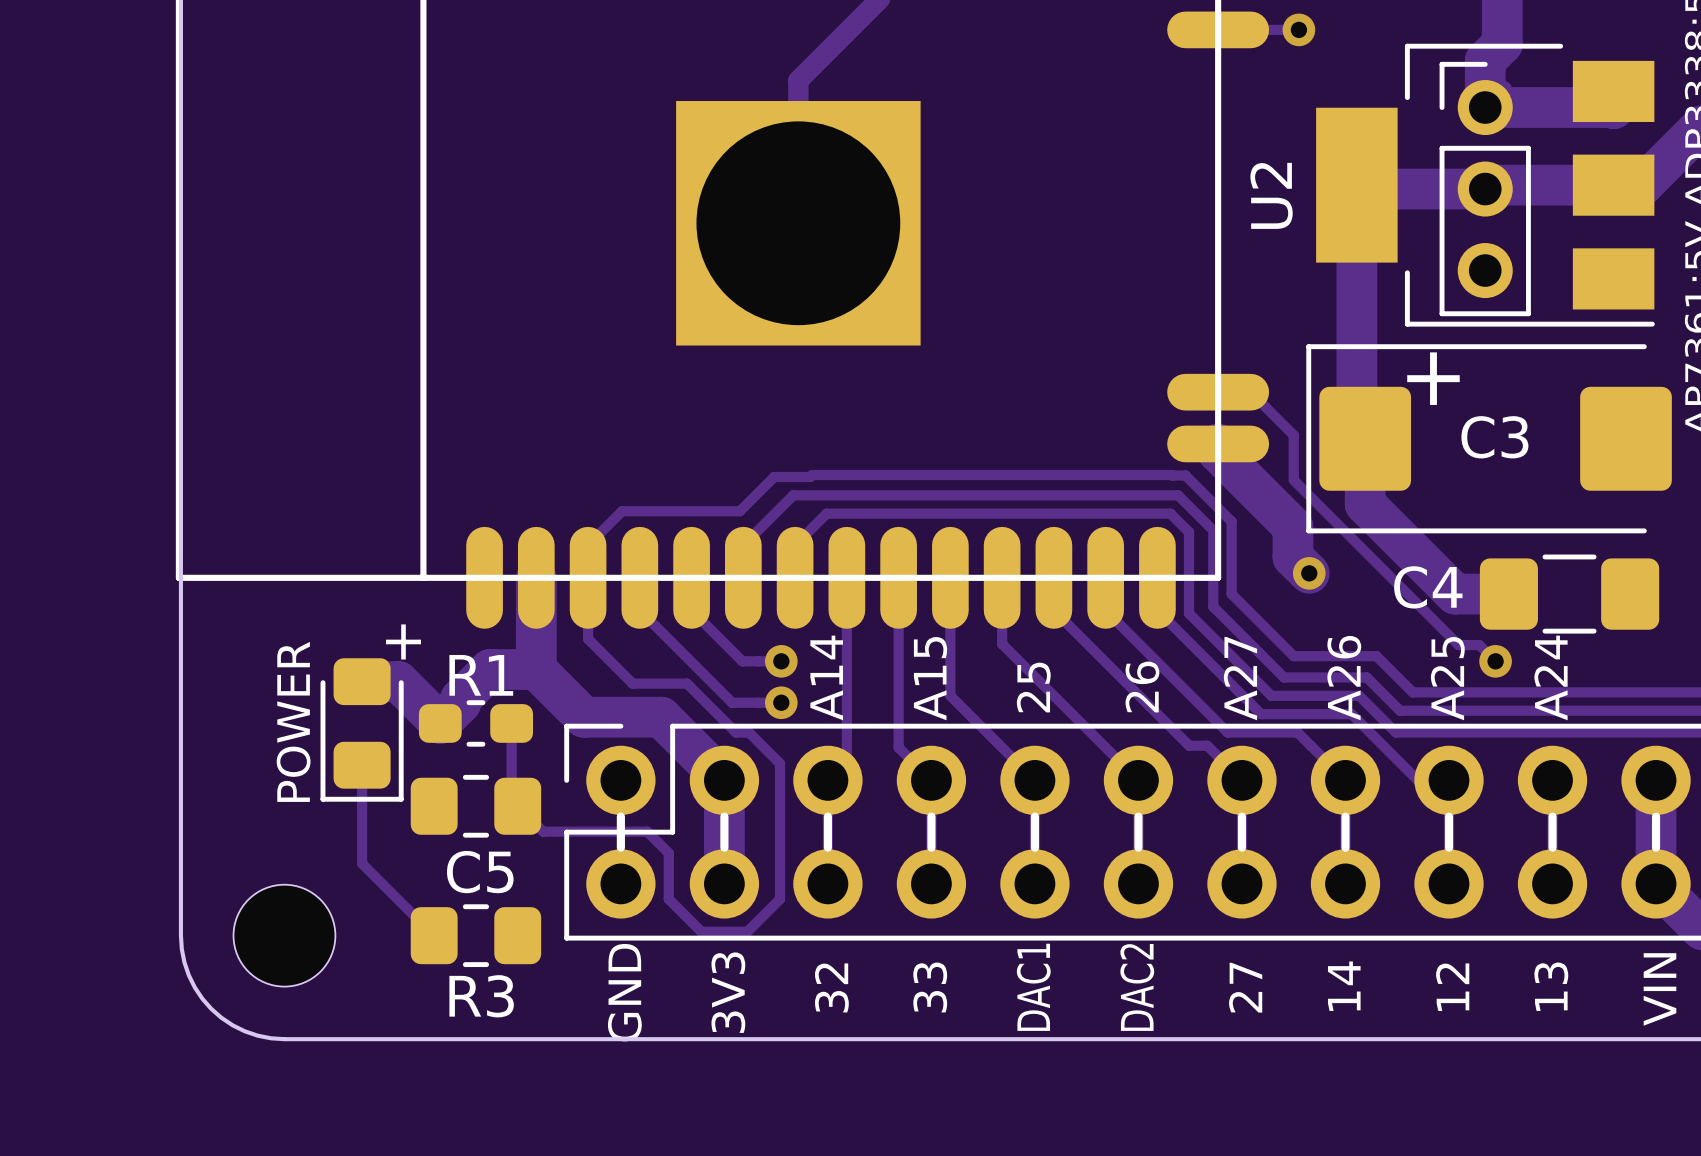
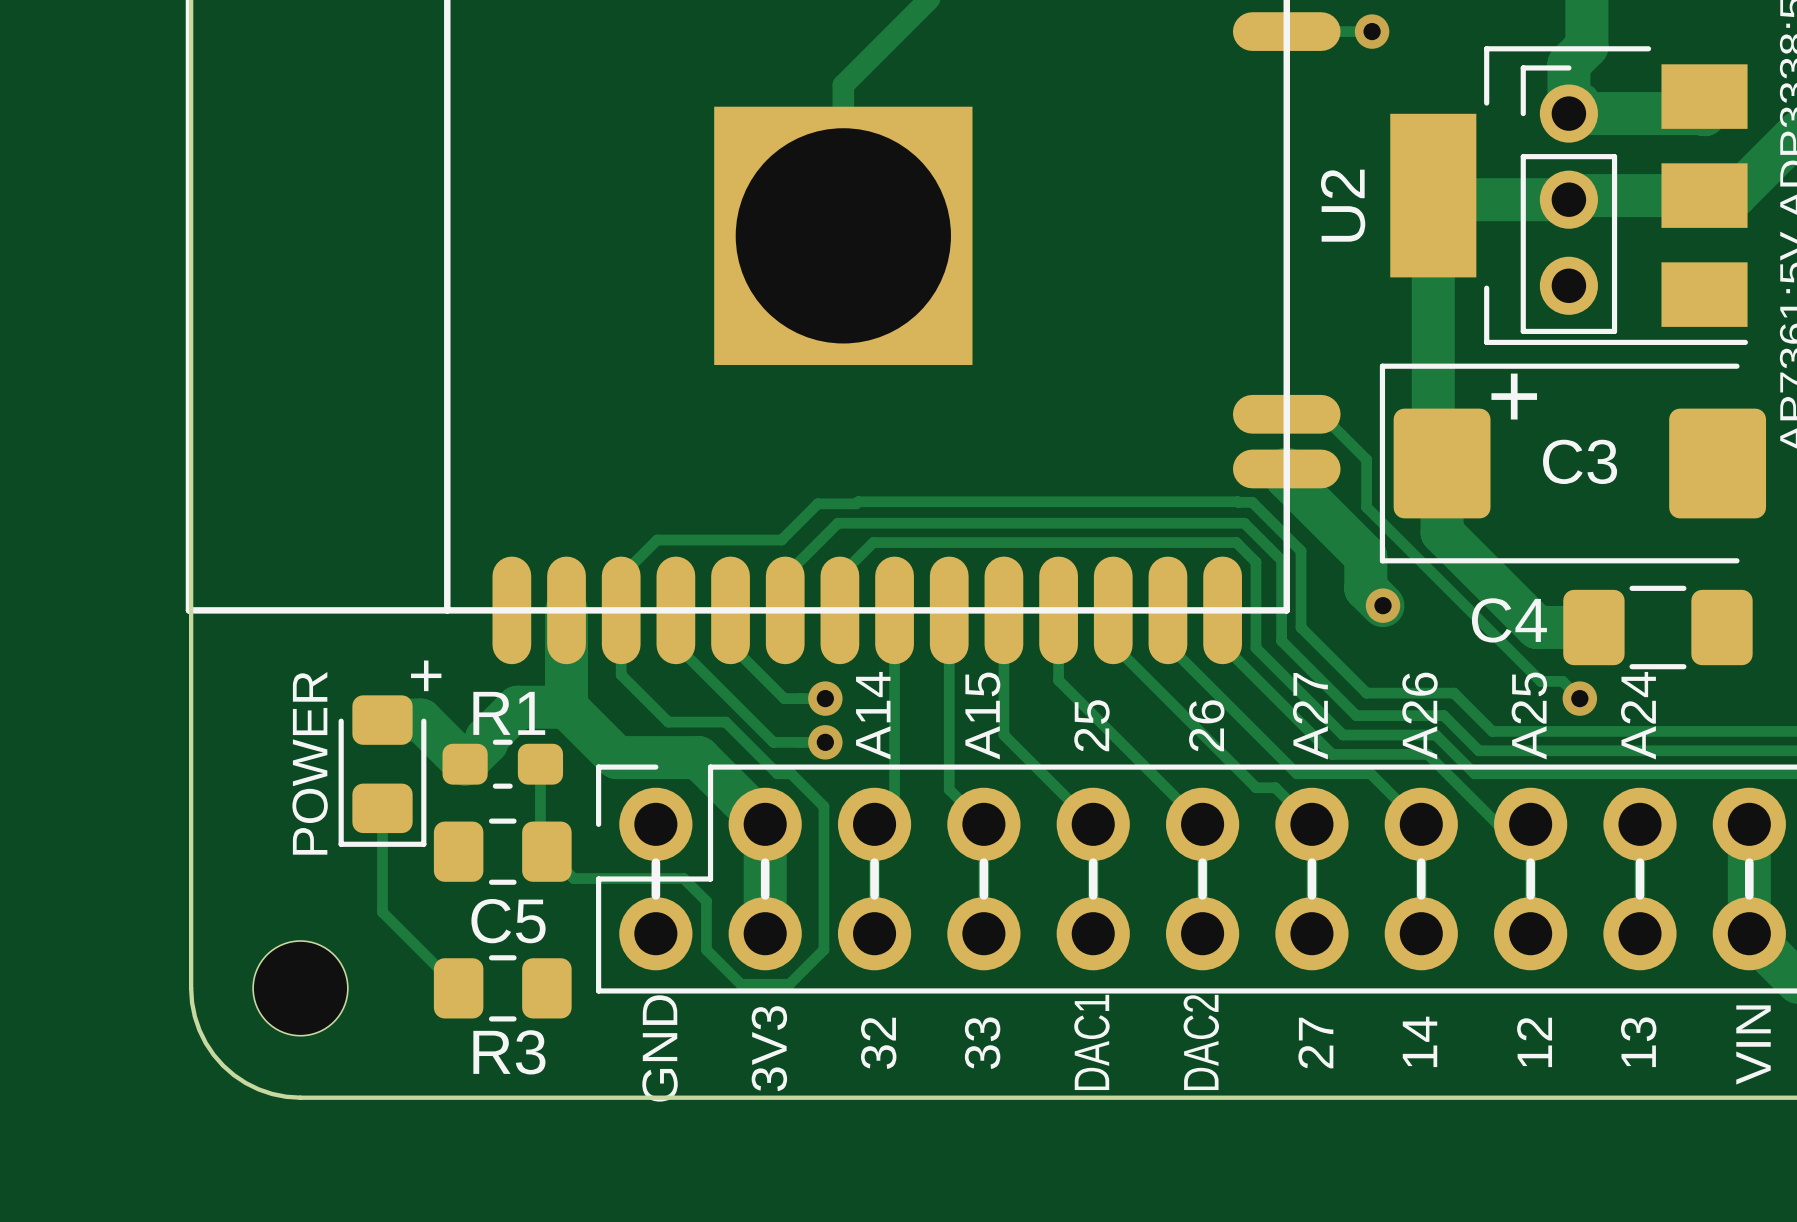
part footprint: [233, 884, 336, 987] -> [253, 941, 348, 1036]

